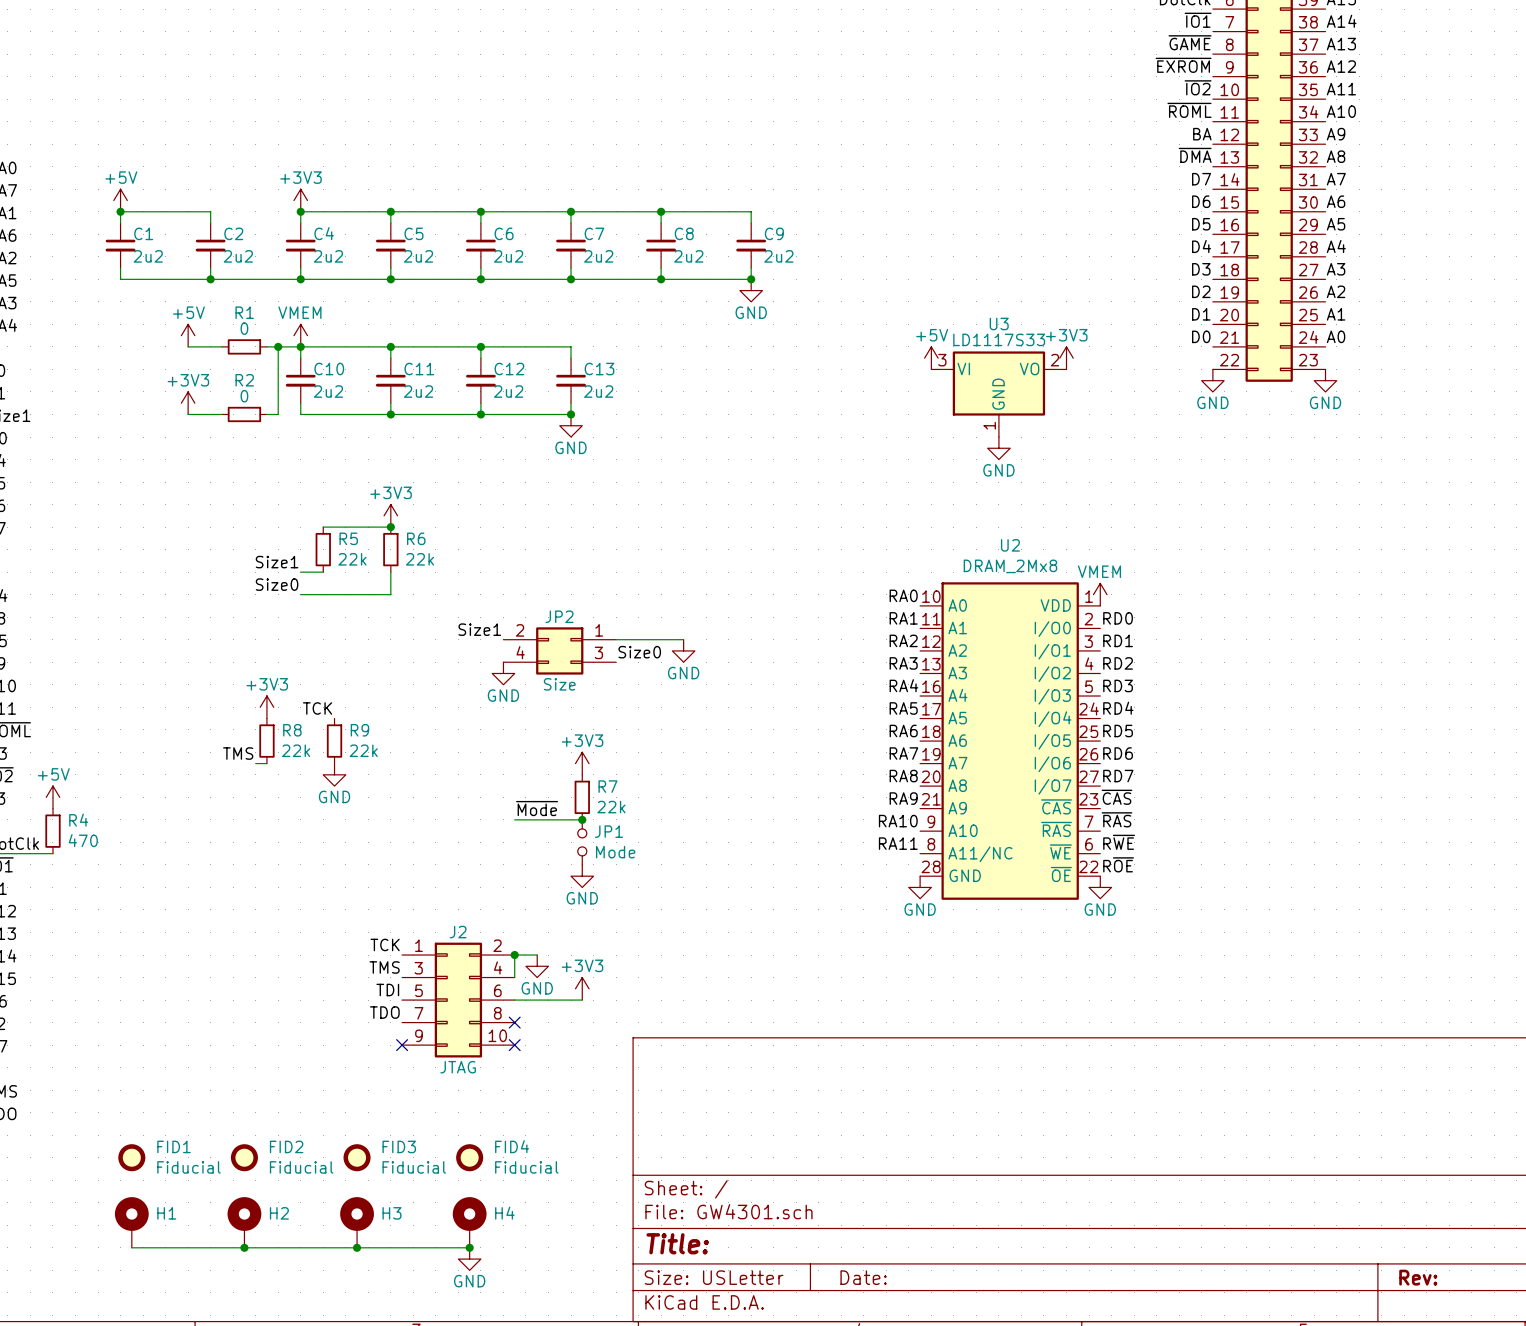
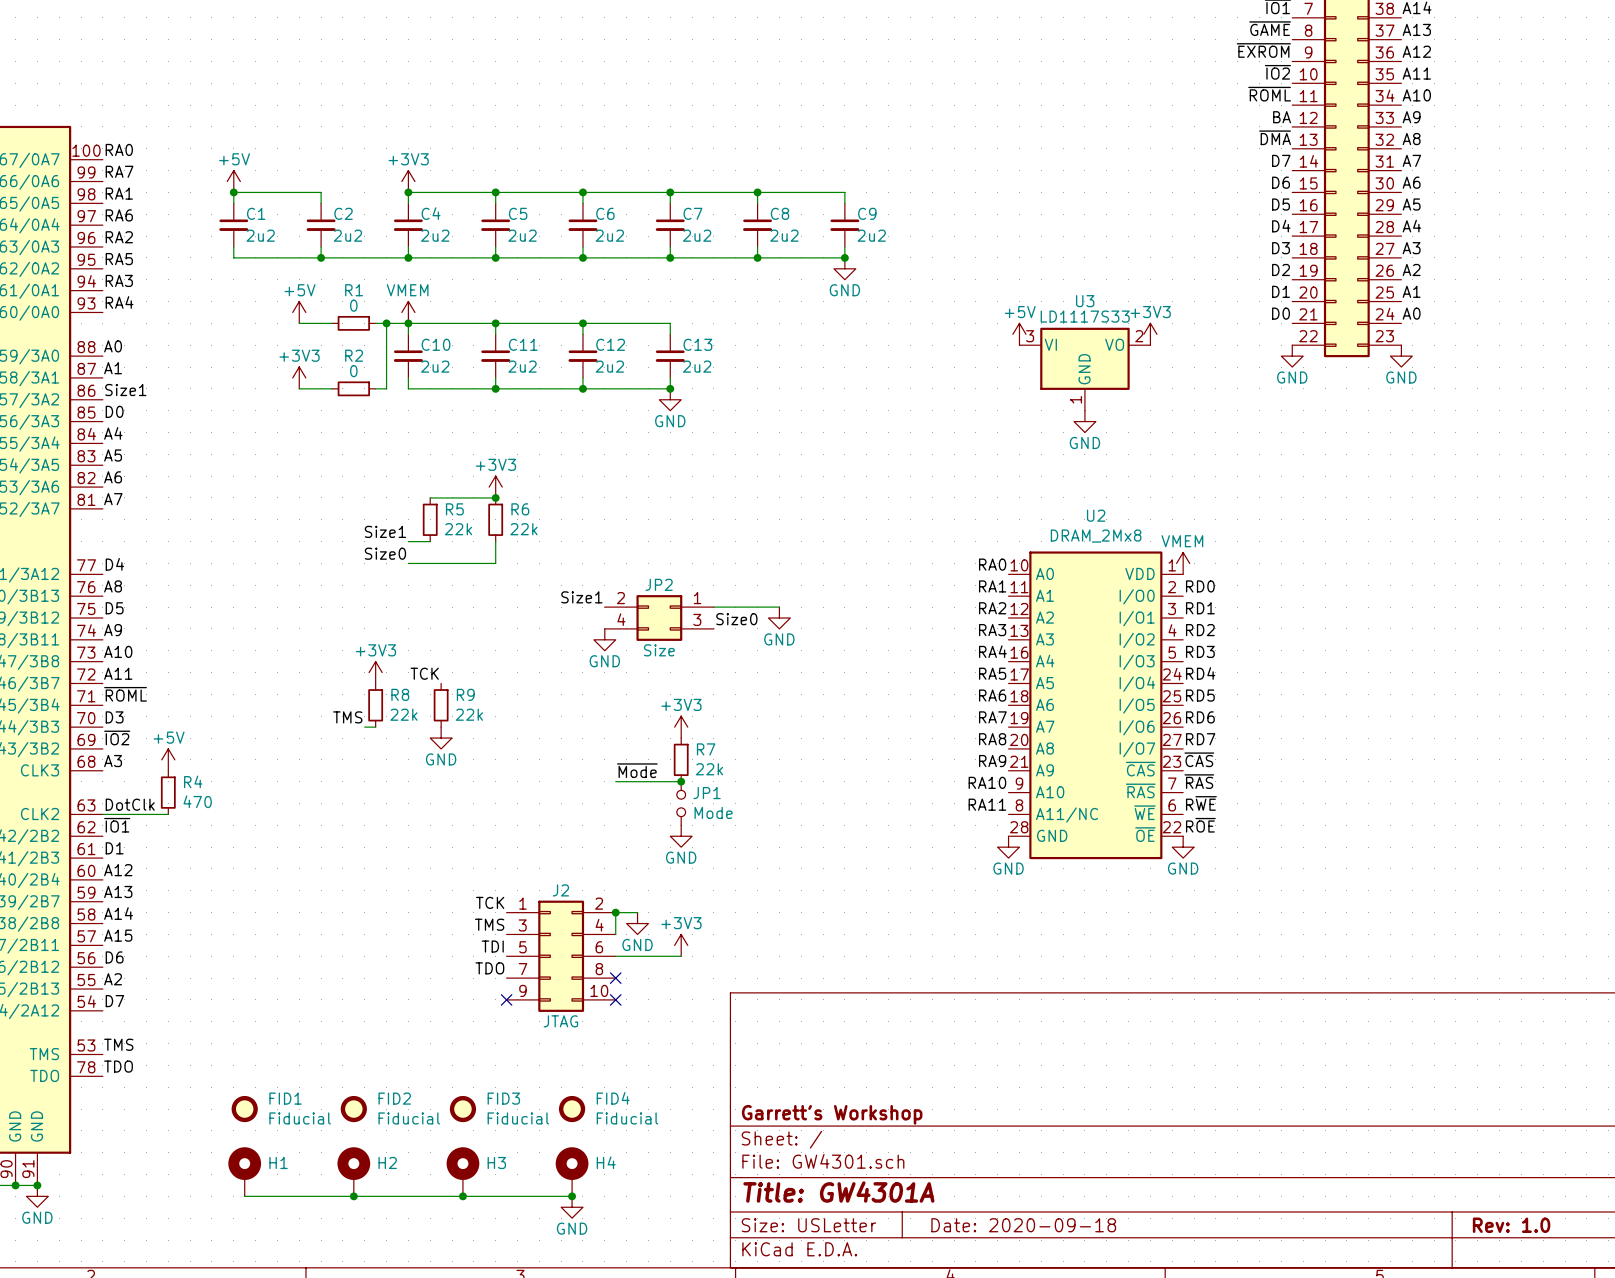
title block: none -> Garrett's Workshop (832, 1114)
title block: Title: (677, 1243) -> Title: GW4301A (838, 1192)
title block: Date: (863, 1277) -> Date: 2020-09-18 (1023, 1225)
title block: Rev: (1418, 1277) -> Rev: 1.0 (1511, 1225)

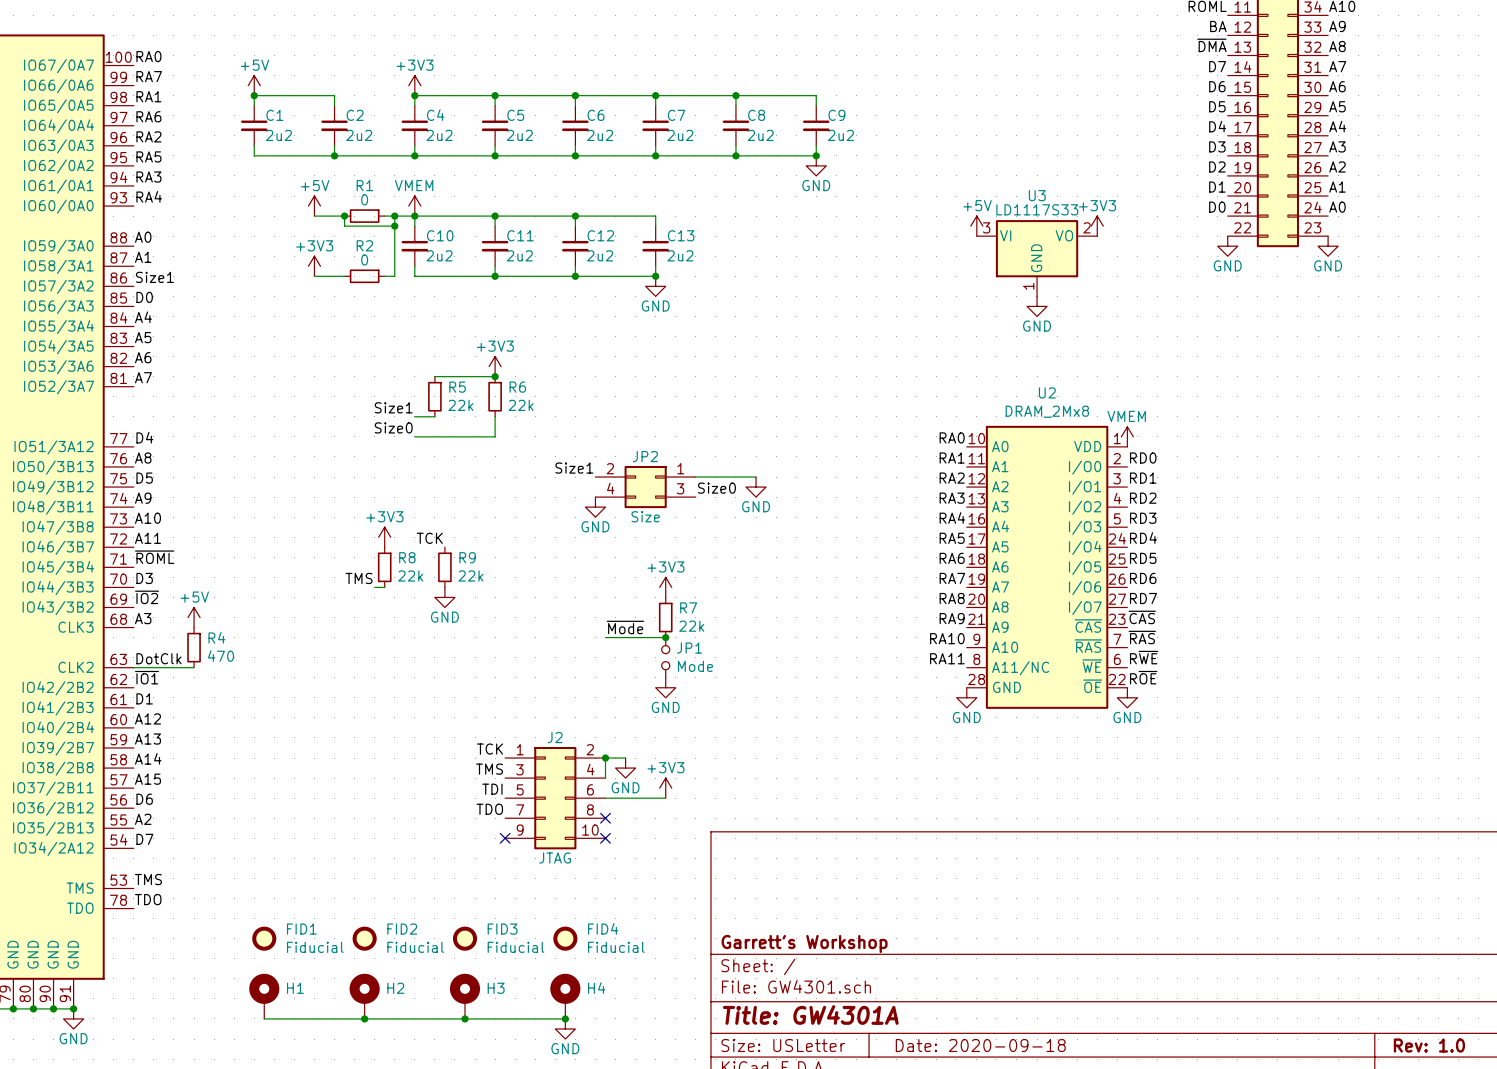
wire: none -> (344, 216) (344, 226) (394, 226)
junction: none -> (344, 216)
junction: none -> (394, 226)

